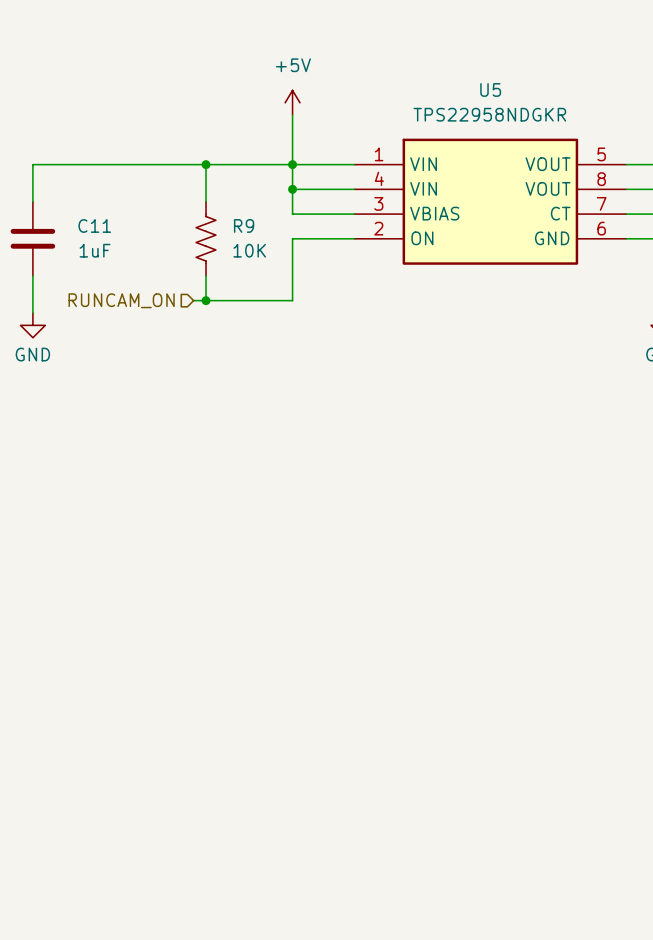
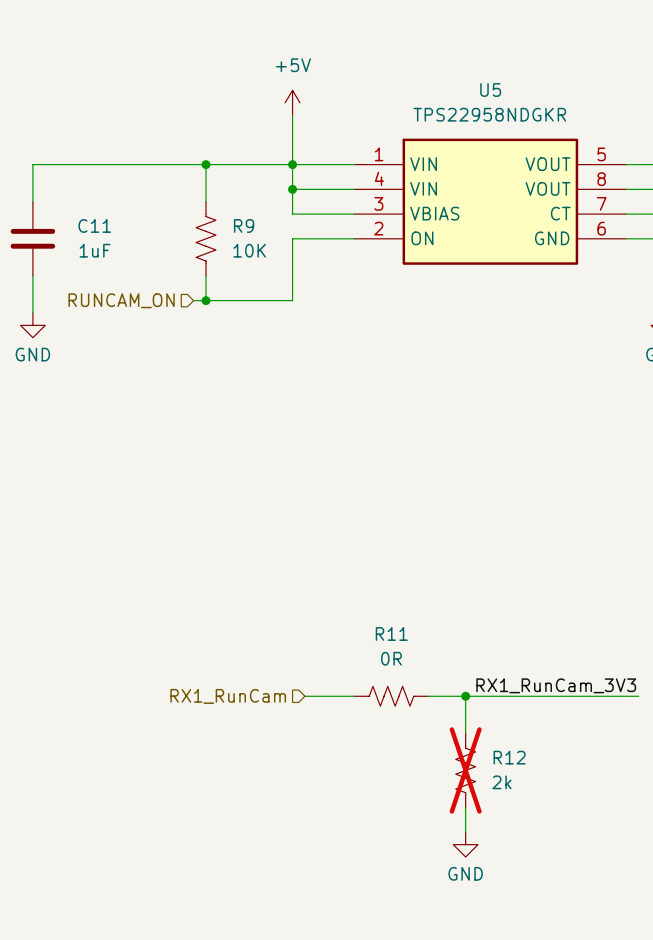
label: none -> RX1_RunCam_3V3 (556, 685)
hierarchical label: none -> RX1_RunCam (228, 696)
wire: none -> (304, 696) (354, 696)
R11: none -> 0R (391, 696)
wire: none -> (428, 696) (638, 696)
wire: none -> (465, 696) (465, 733)
junction: none -> (465, 696)
R12: none -> 2k (465, 770)
wire: none -> (465, 807) (465, 832)
power symbol: none -> GND (465, 844)

